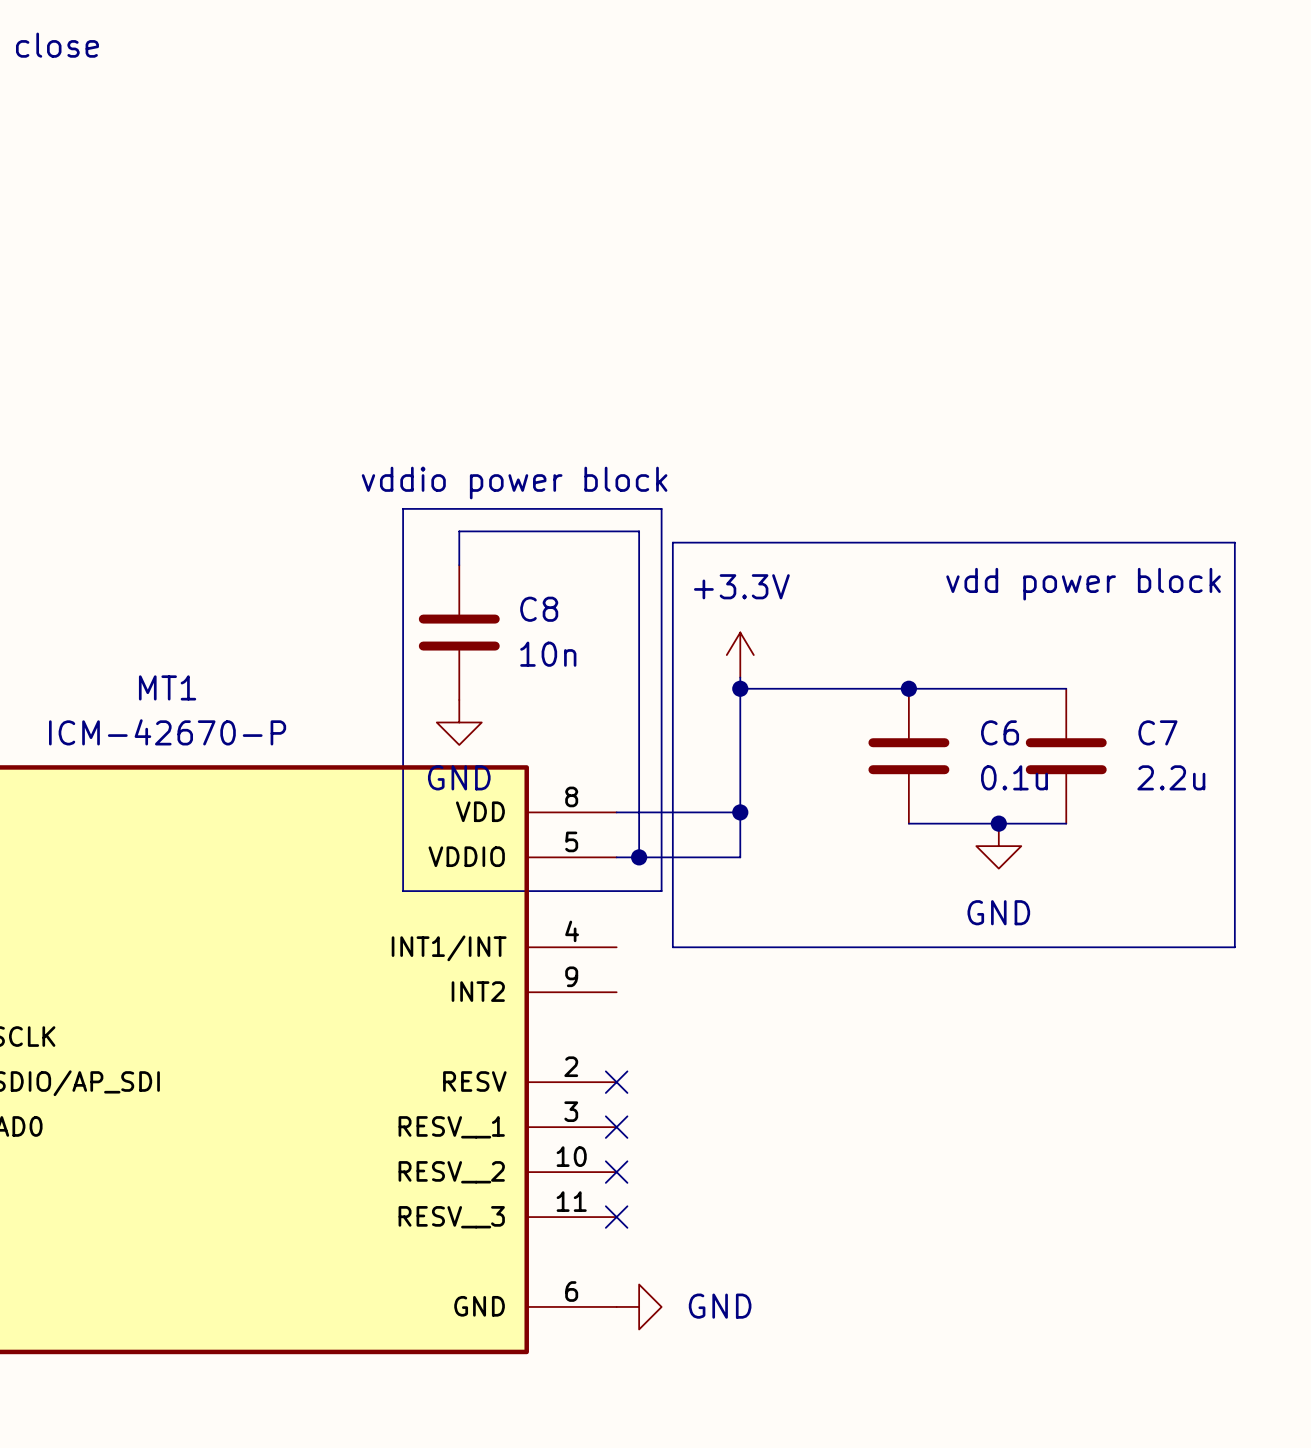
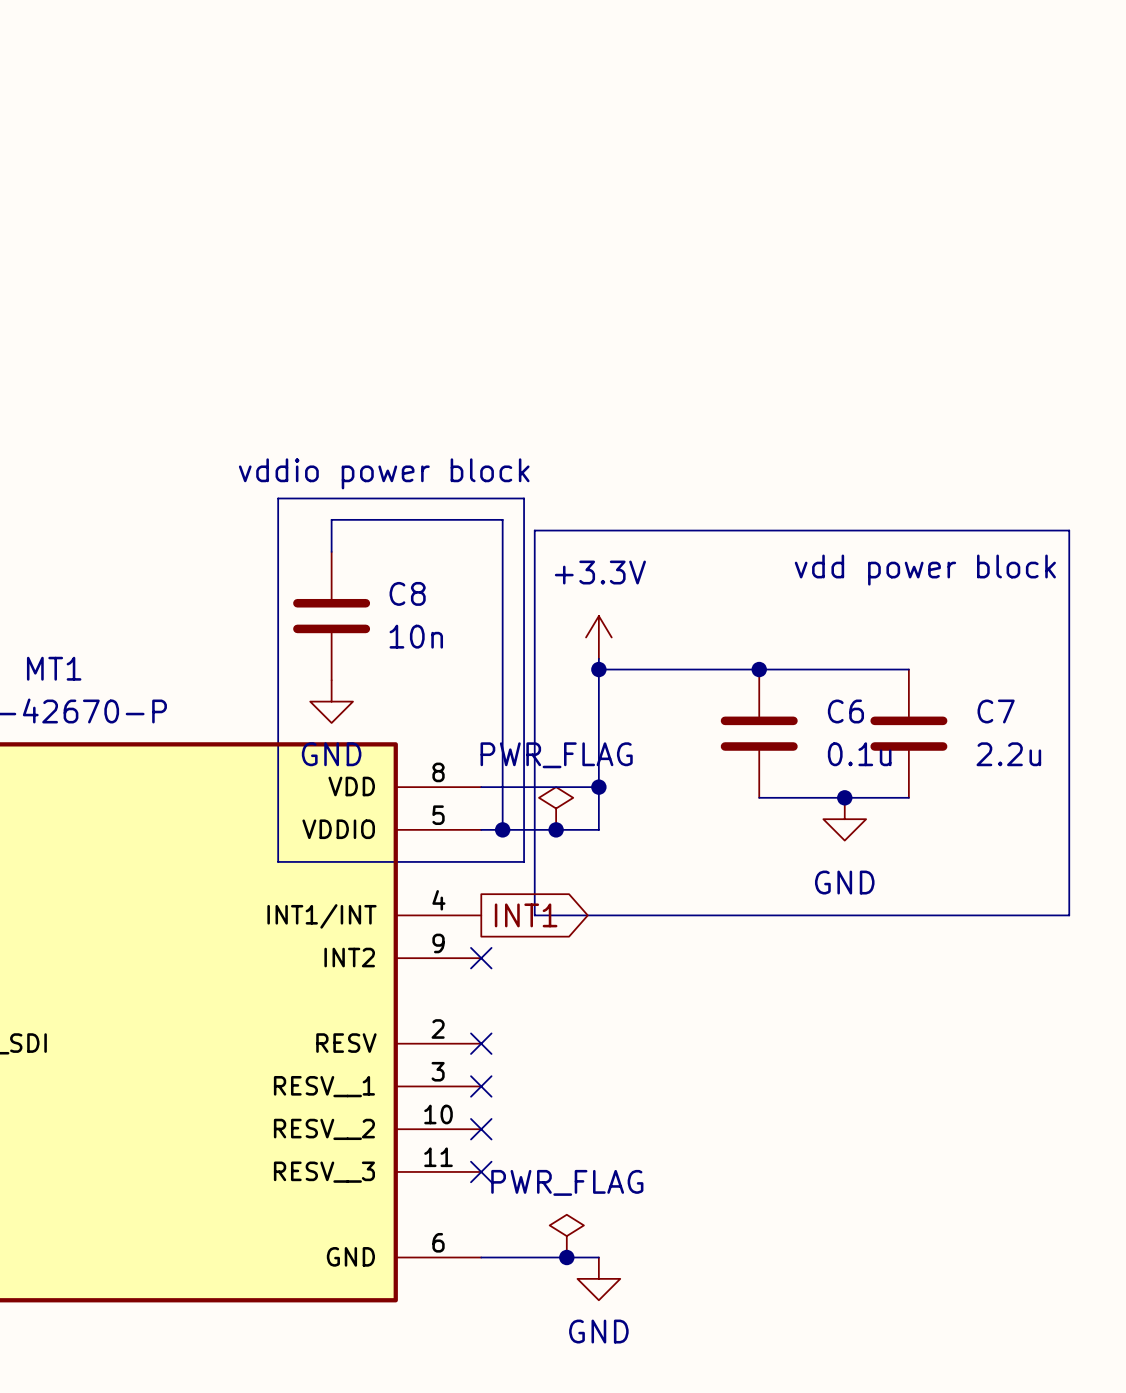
power symbol: none -> PWR_FLAG (556, 808)
junction: none -> (556, 829)
global label: none -> INT1 (526, 915)
no-connect mark: none -> (481, 958)
power symbol: none -> PWR_FLAG (566, 1236)
wire: none -> (481, 1257) (598, 1257)
power symbol rotation: 0° (639, 1306) -> 90° clockwise (598, 1278)
power symbol position: GND (639, 1306) -> GND (598, 1278)
junction: none -> (566, 1257)

